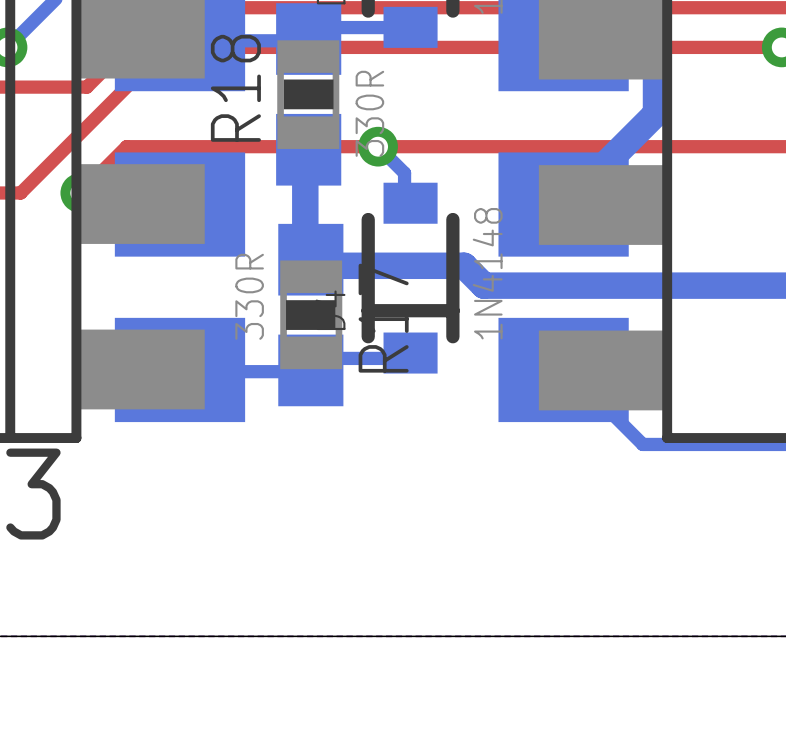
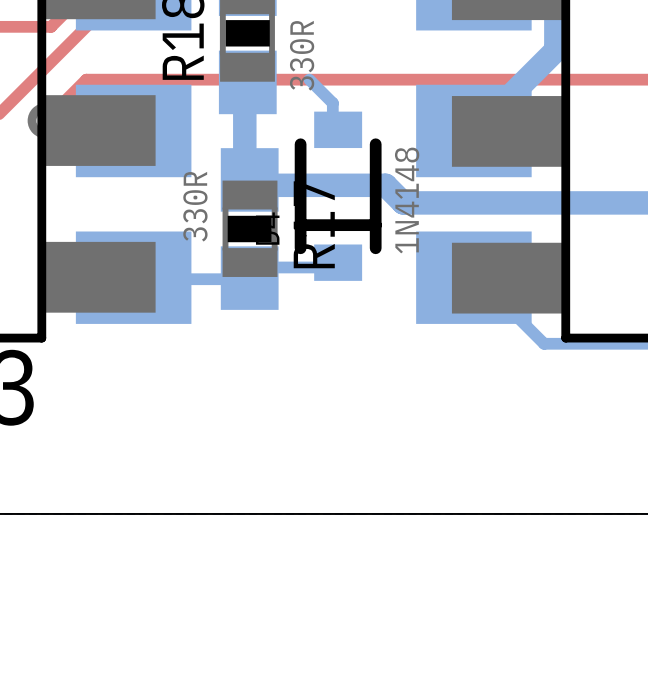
via: (378, 146) -> none

